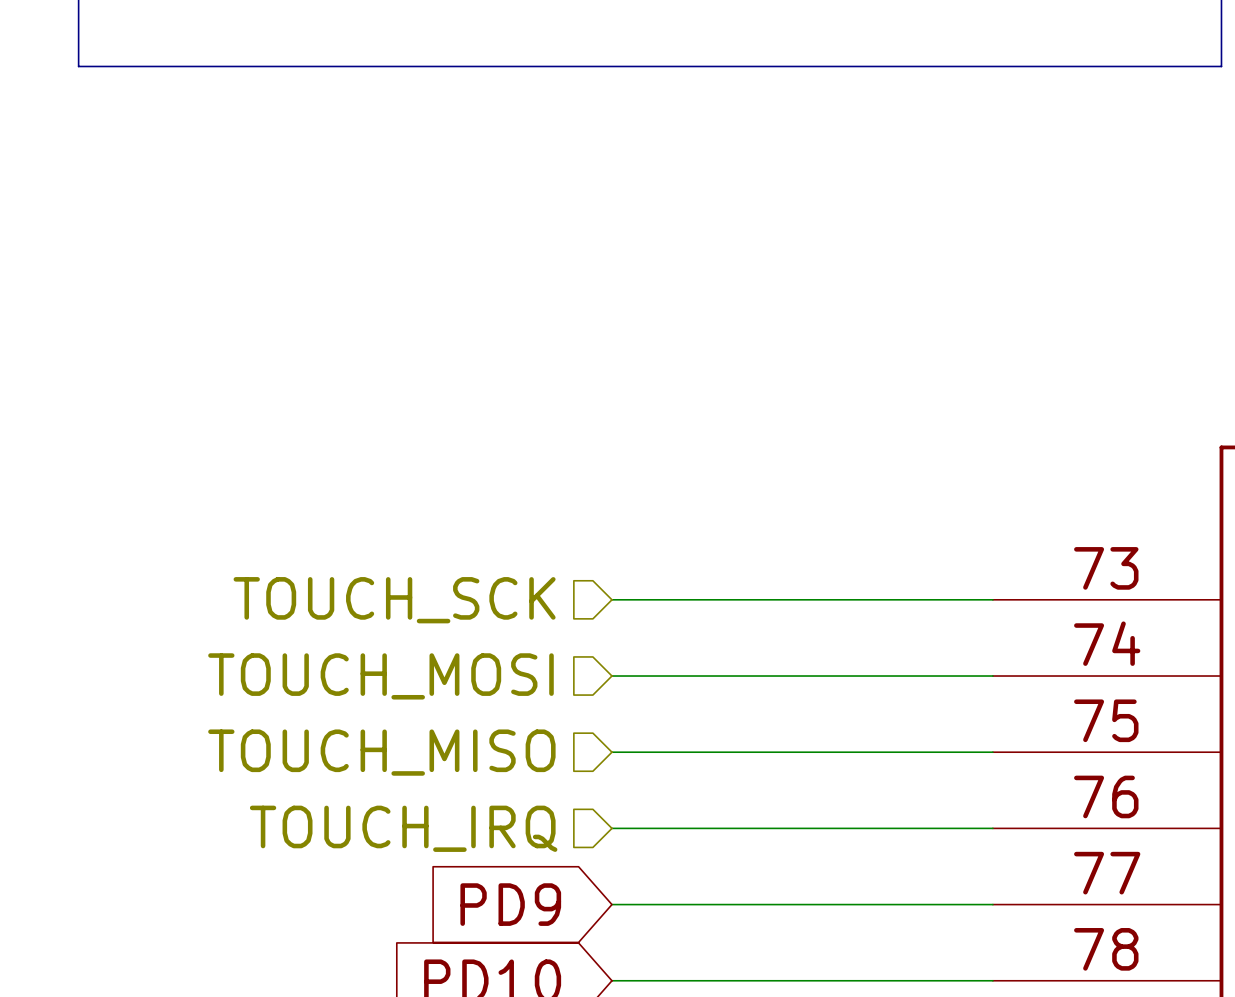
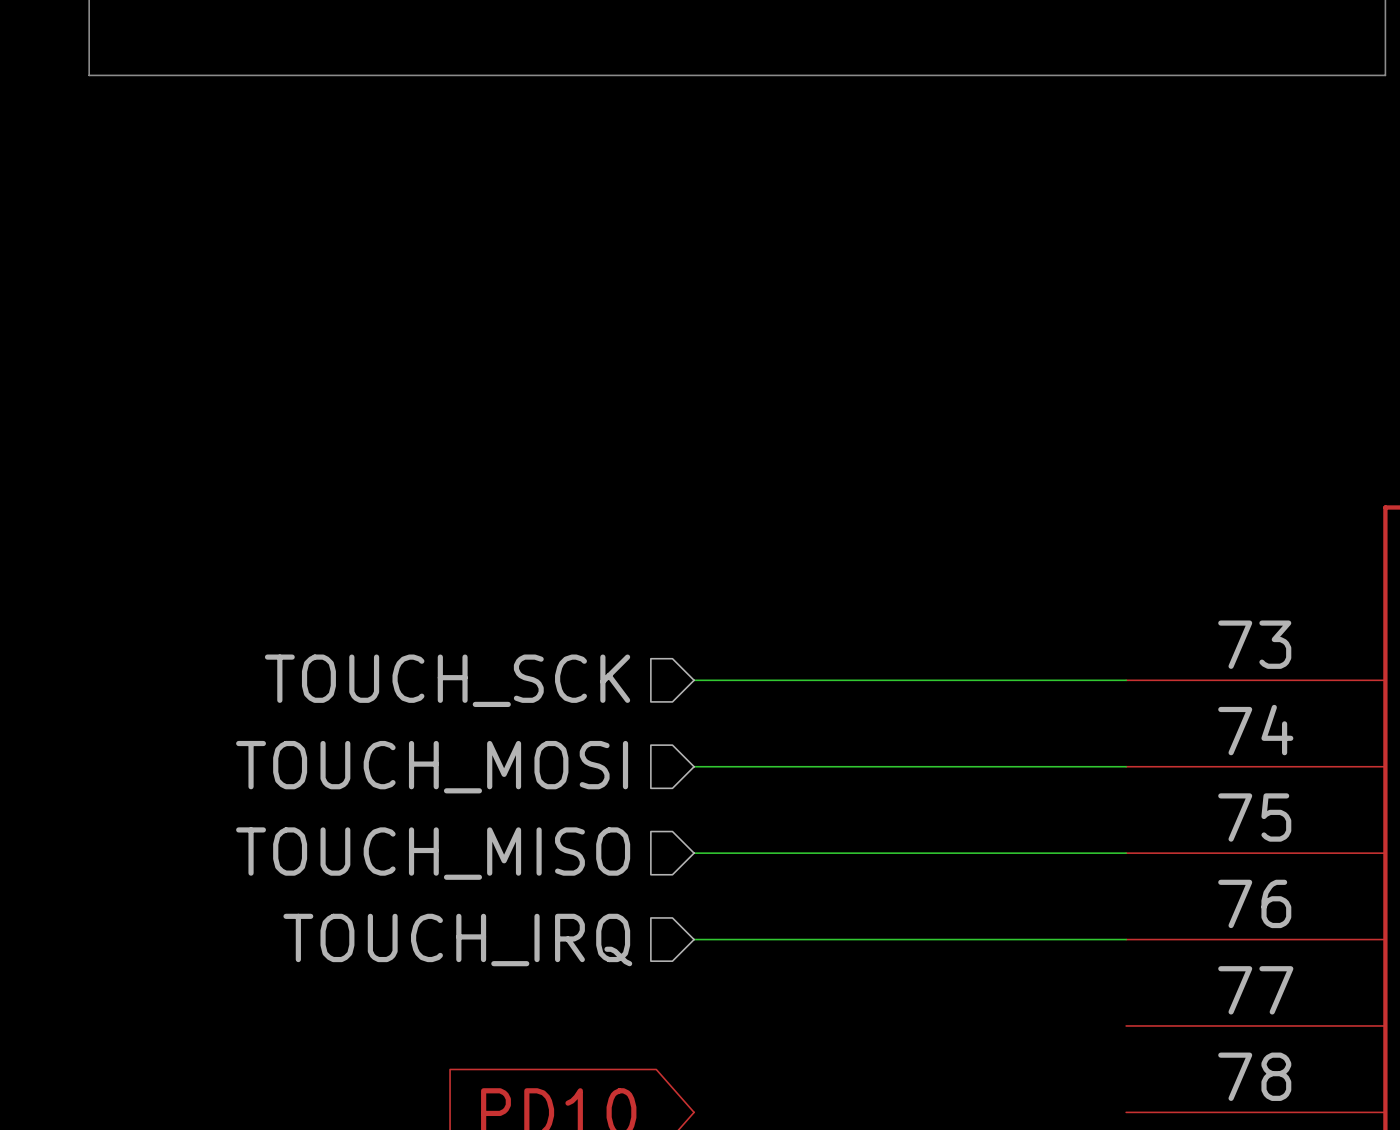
global label: PD9 (510, 904) -> none
wire: (611, 904) (992, 904) -> none
wire: (611, 980) (992, 980) -> none

